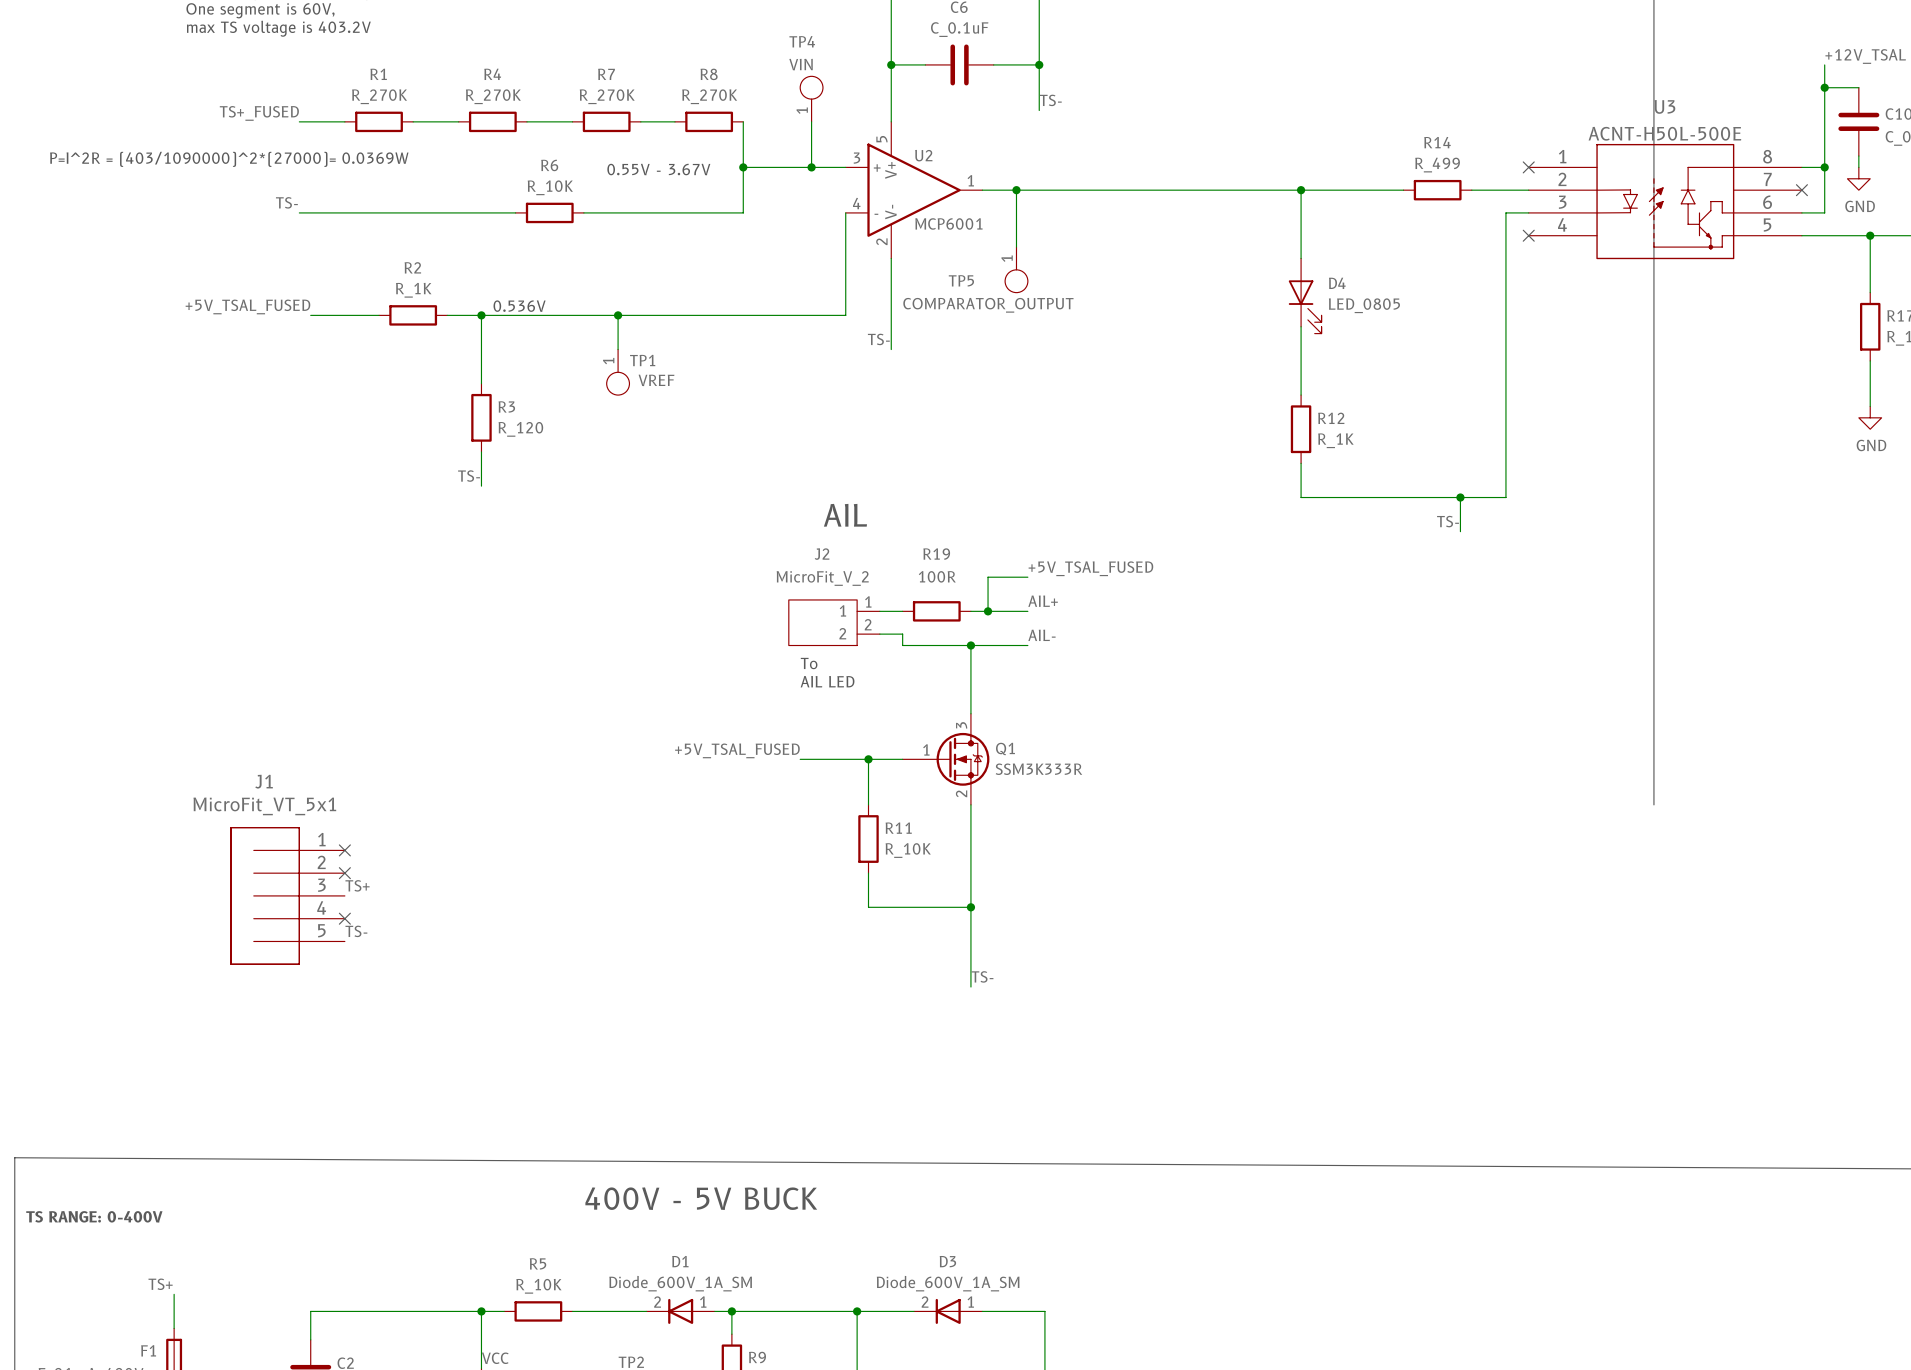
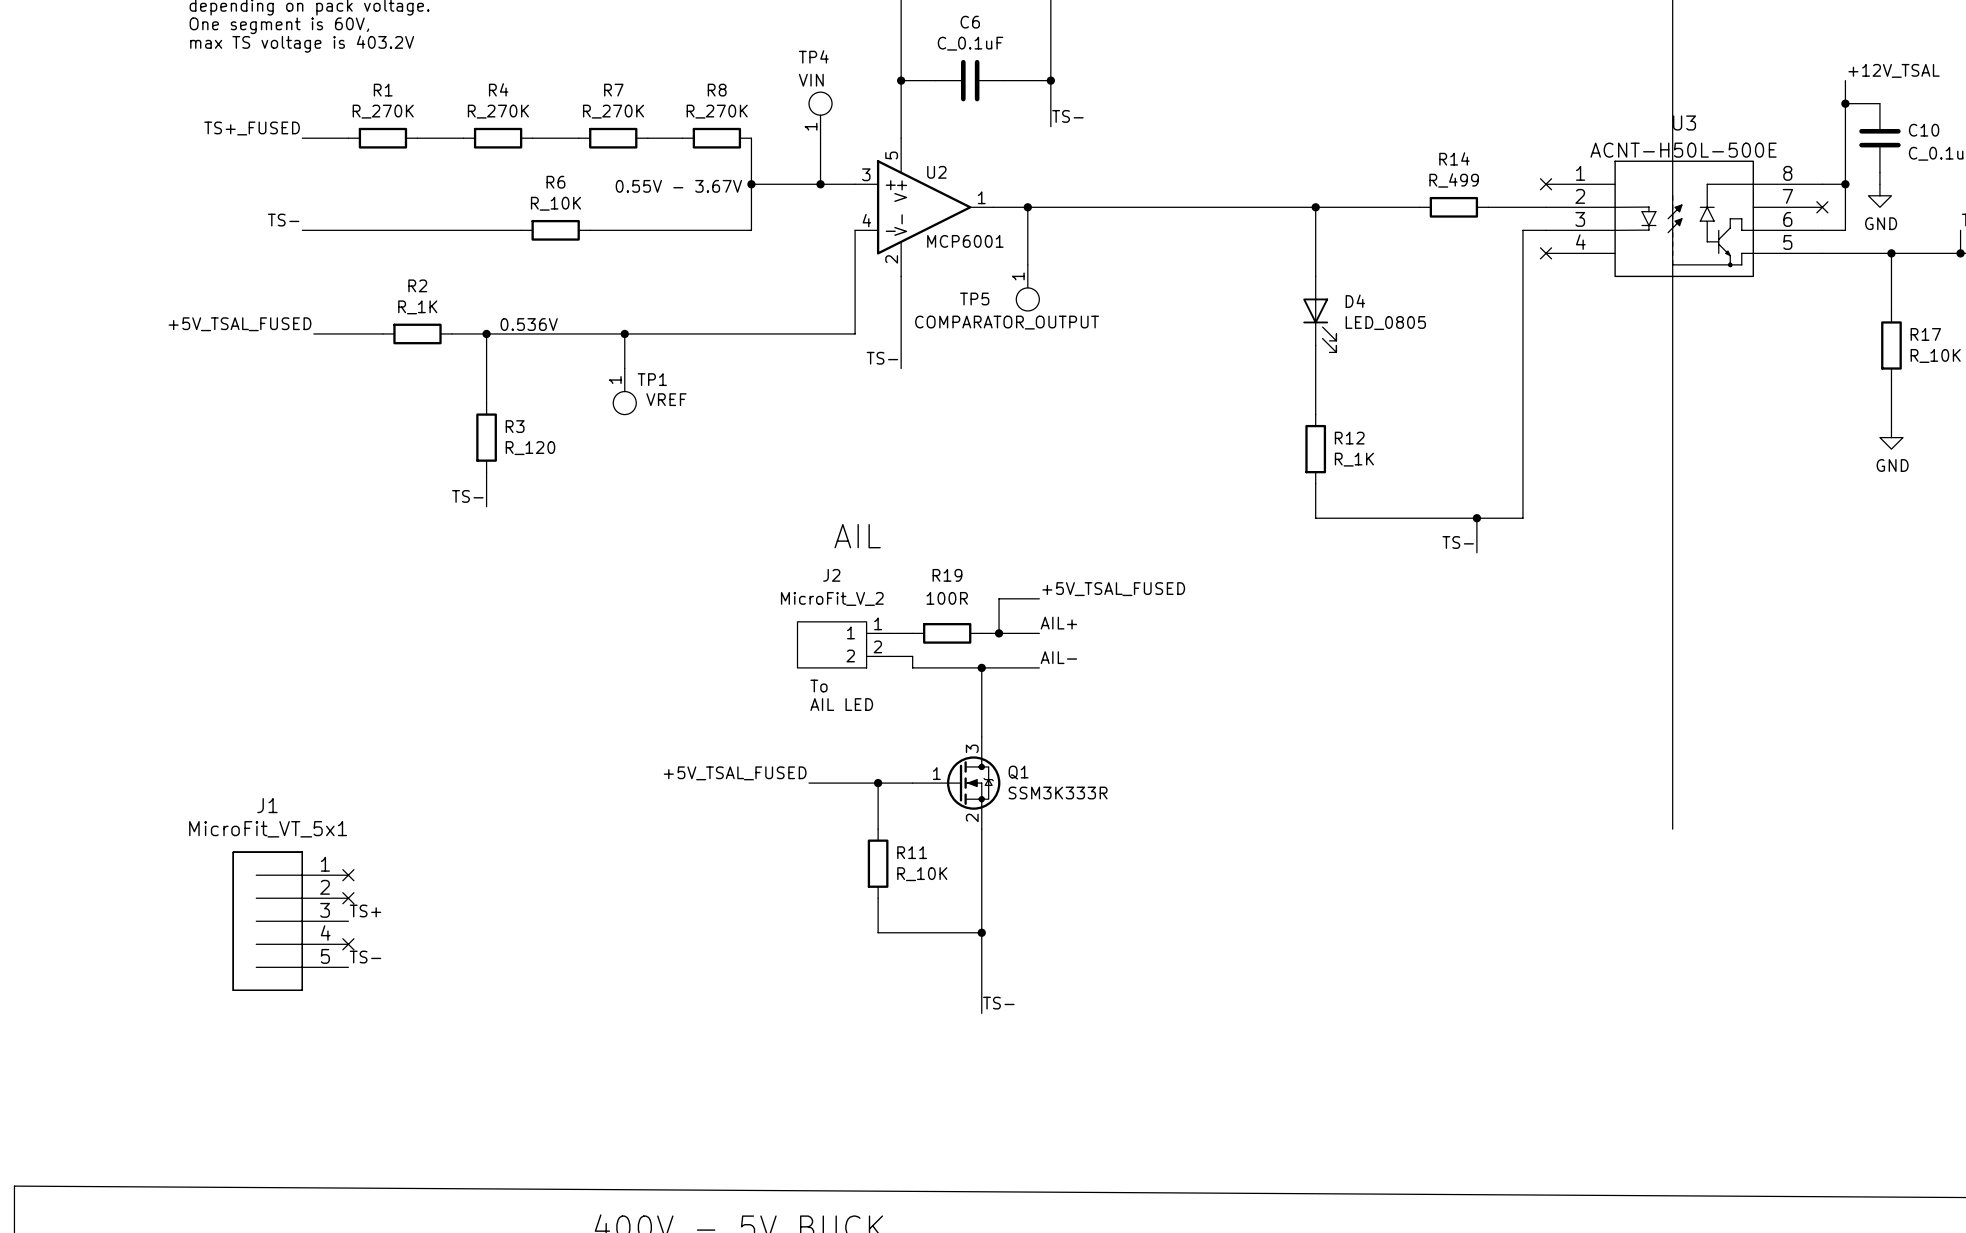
text: P=I^2R = (403/1090000)^2*(27000)= 0.0369W (229, 159) -> none

